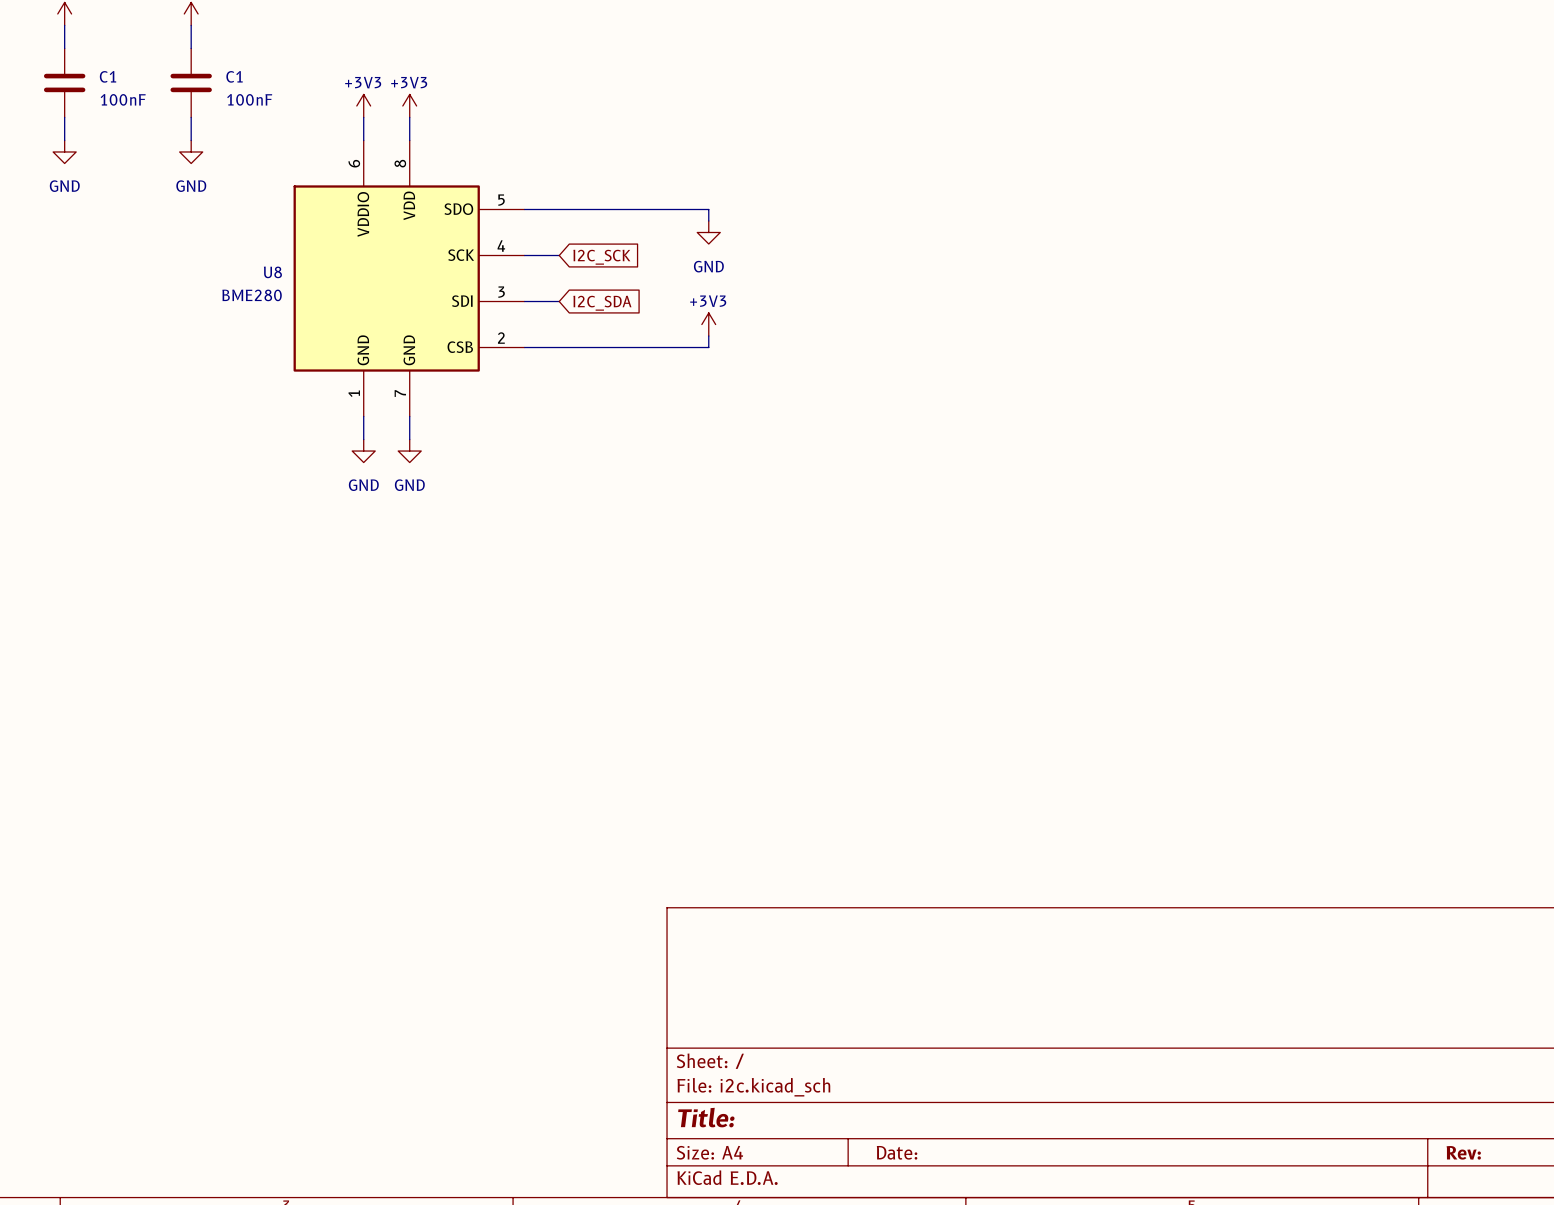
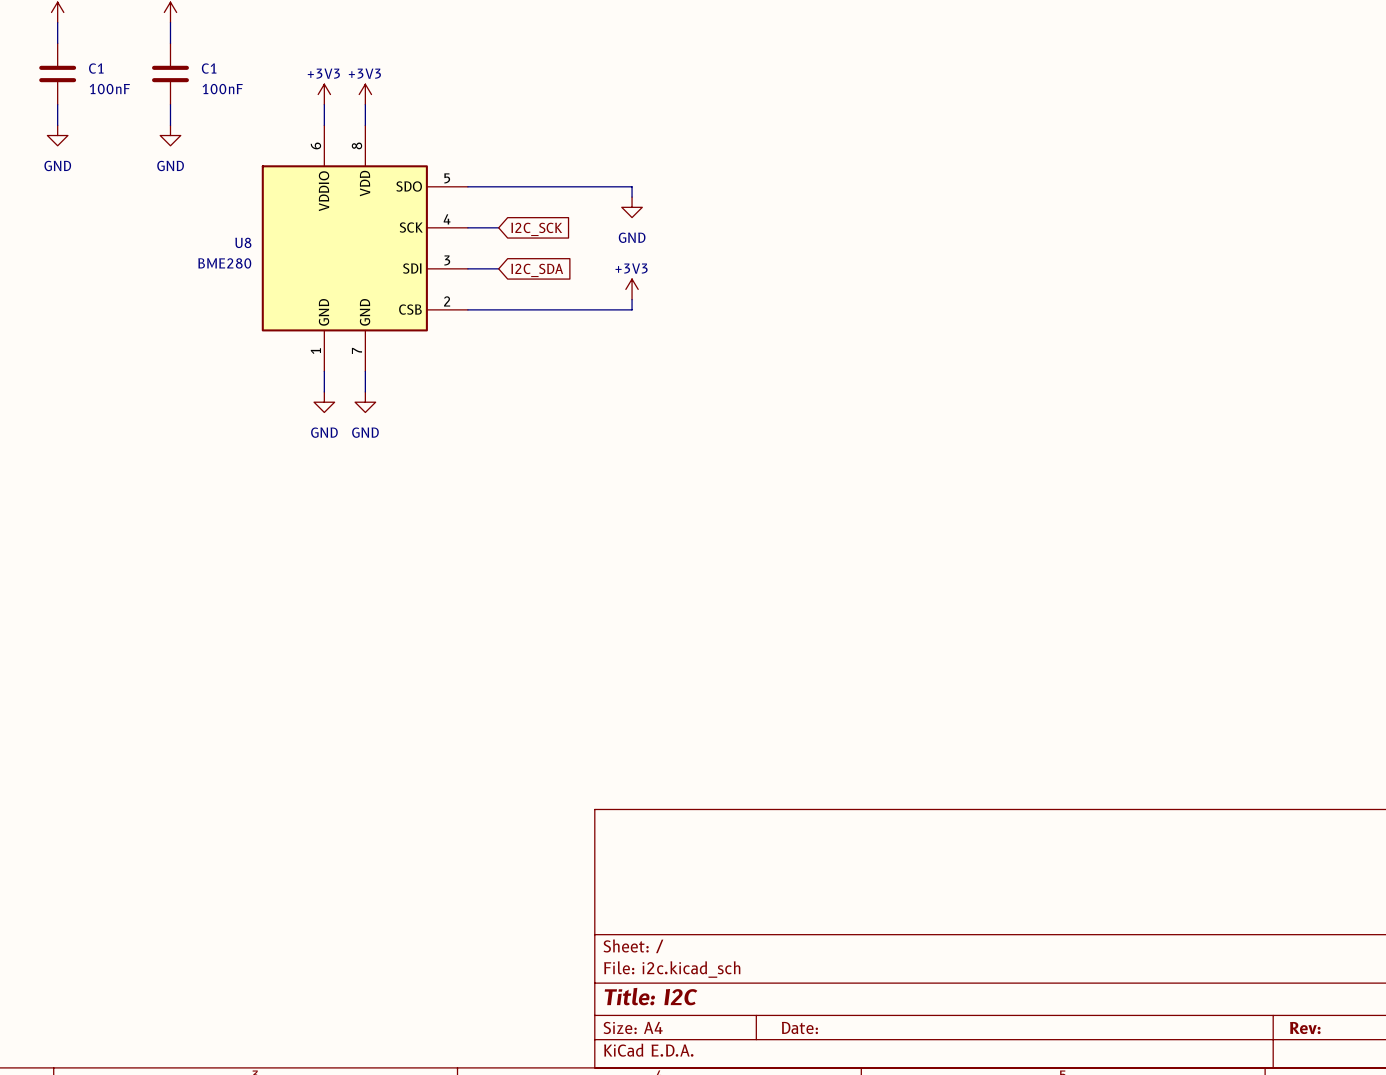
title block: Title: (706, 1117) -> Title: I2C (651, 996)

